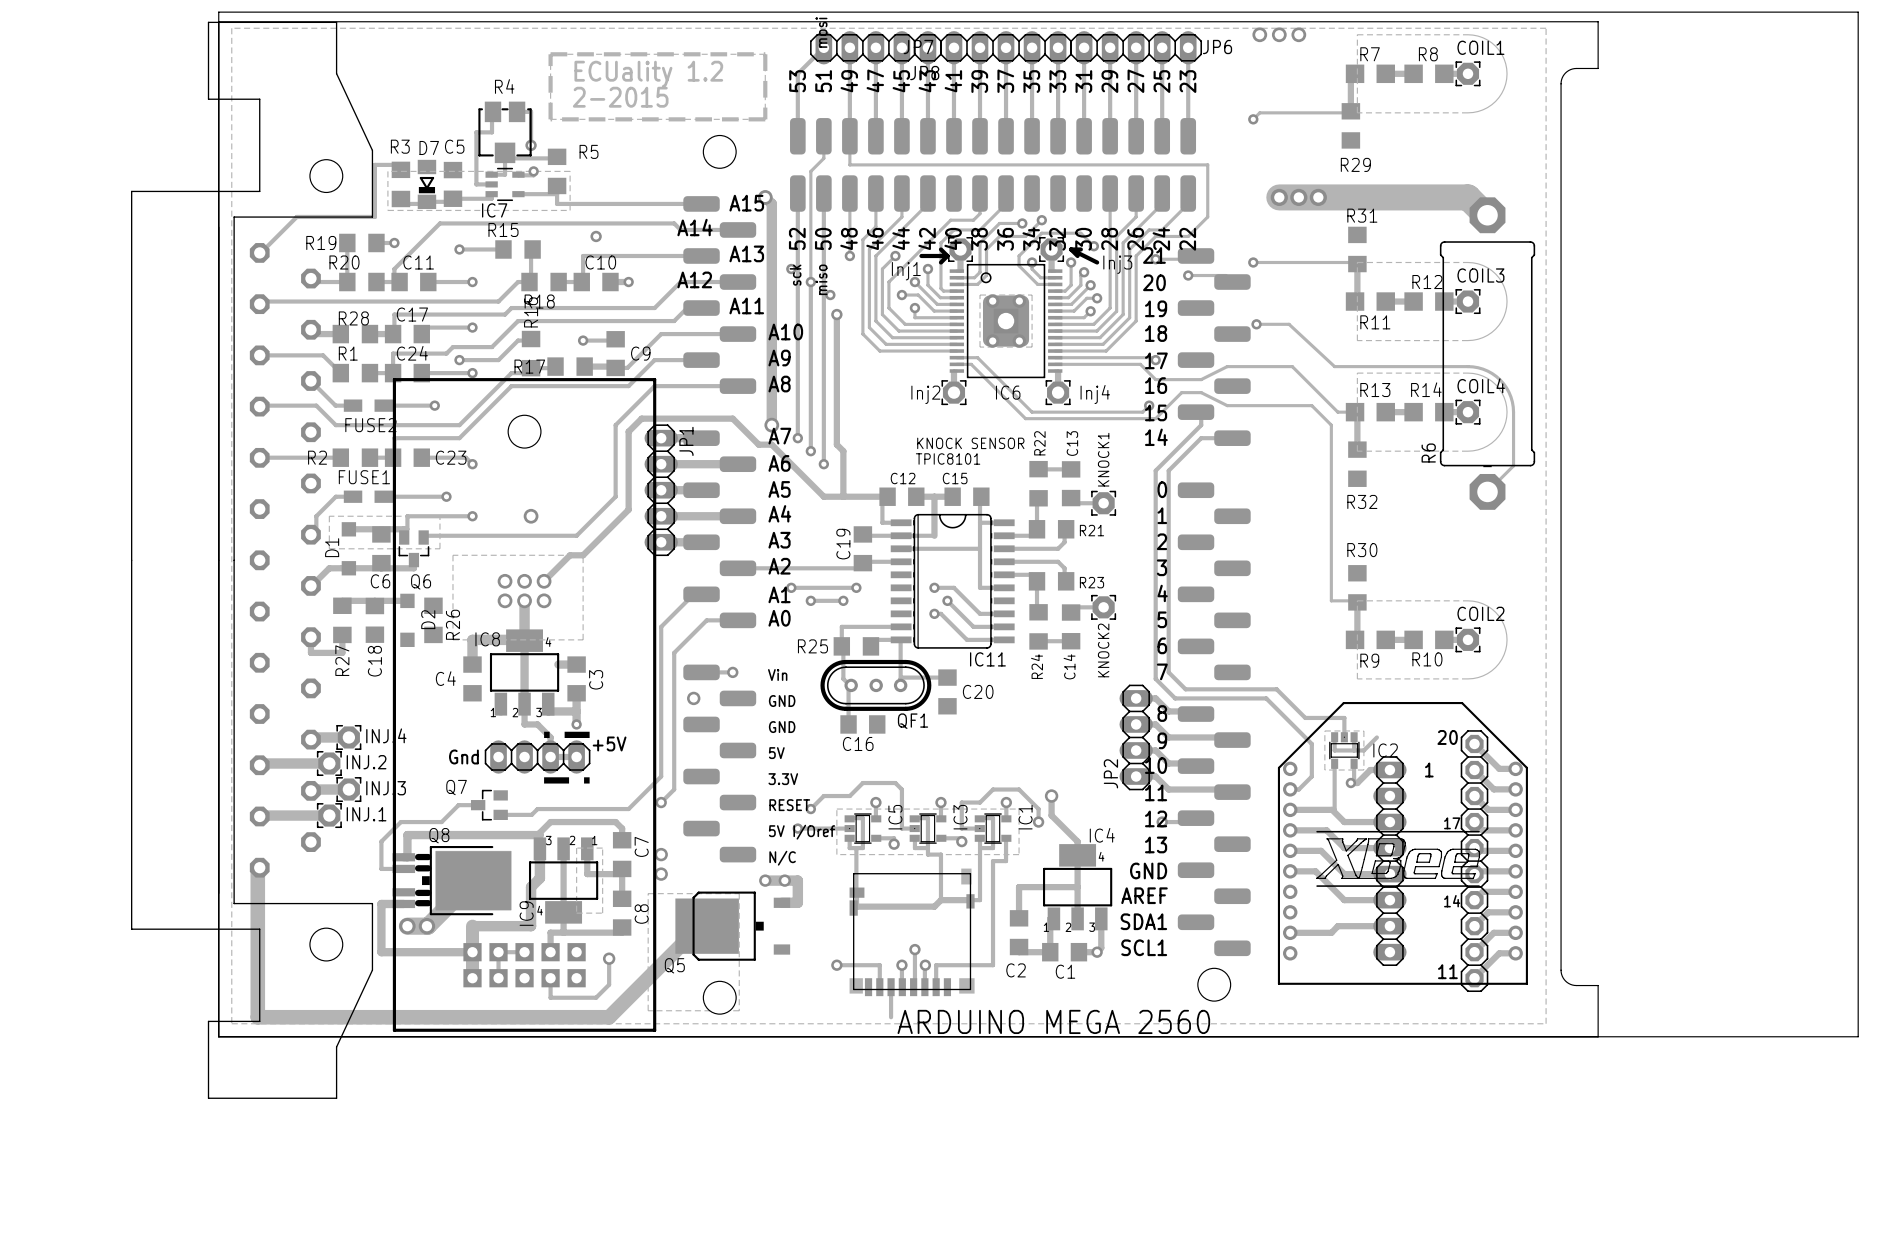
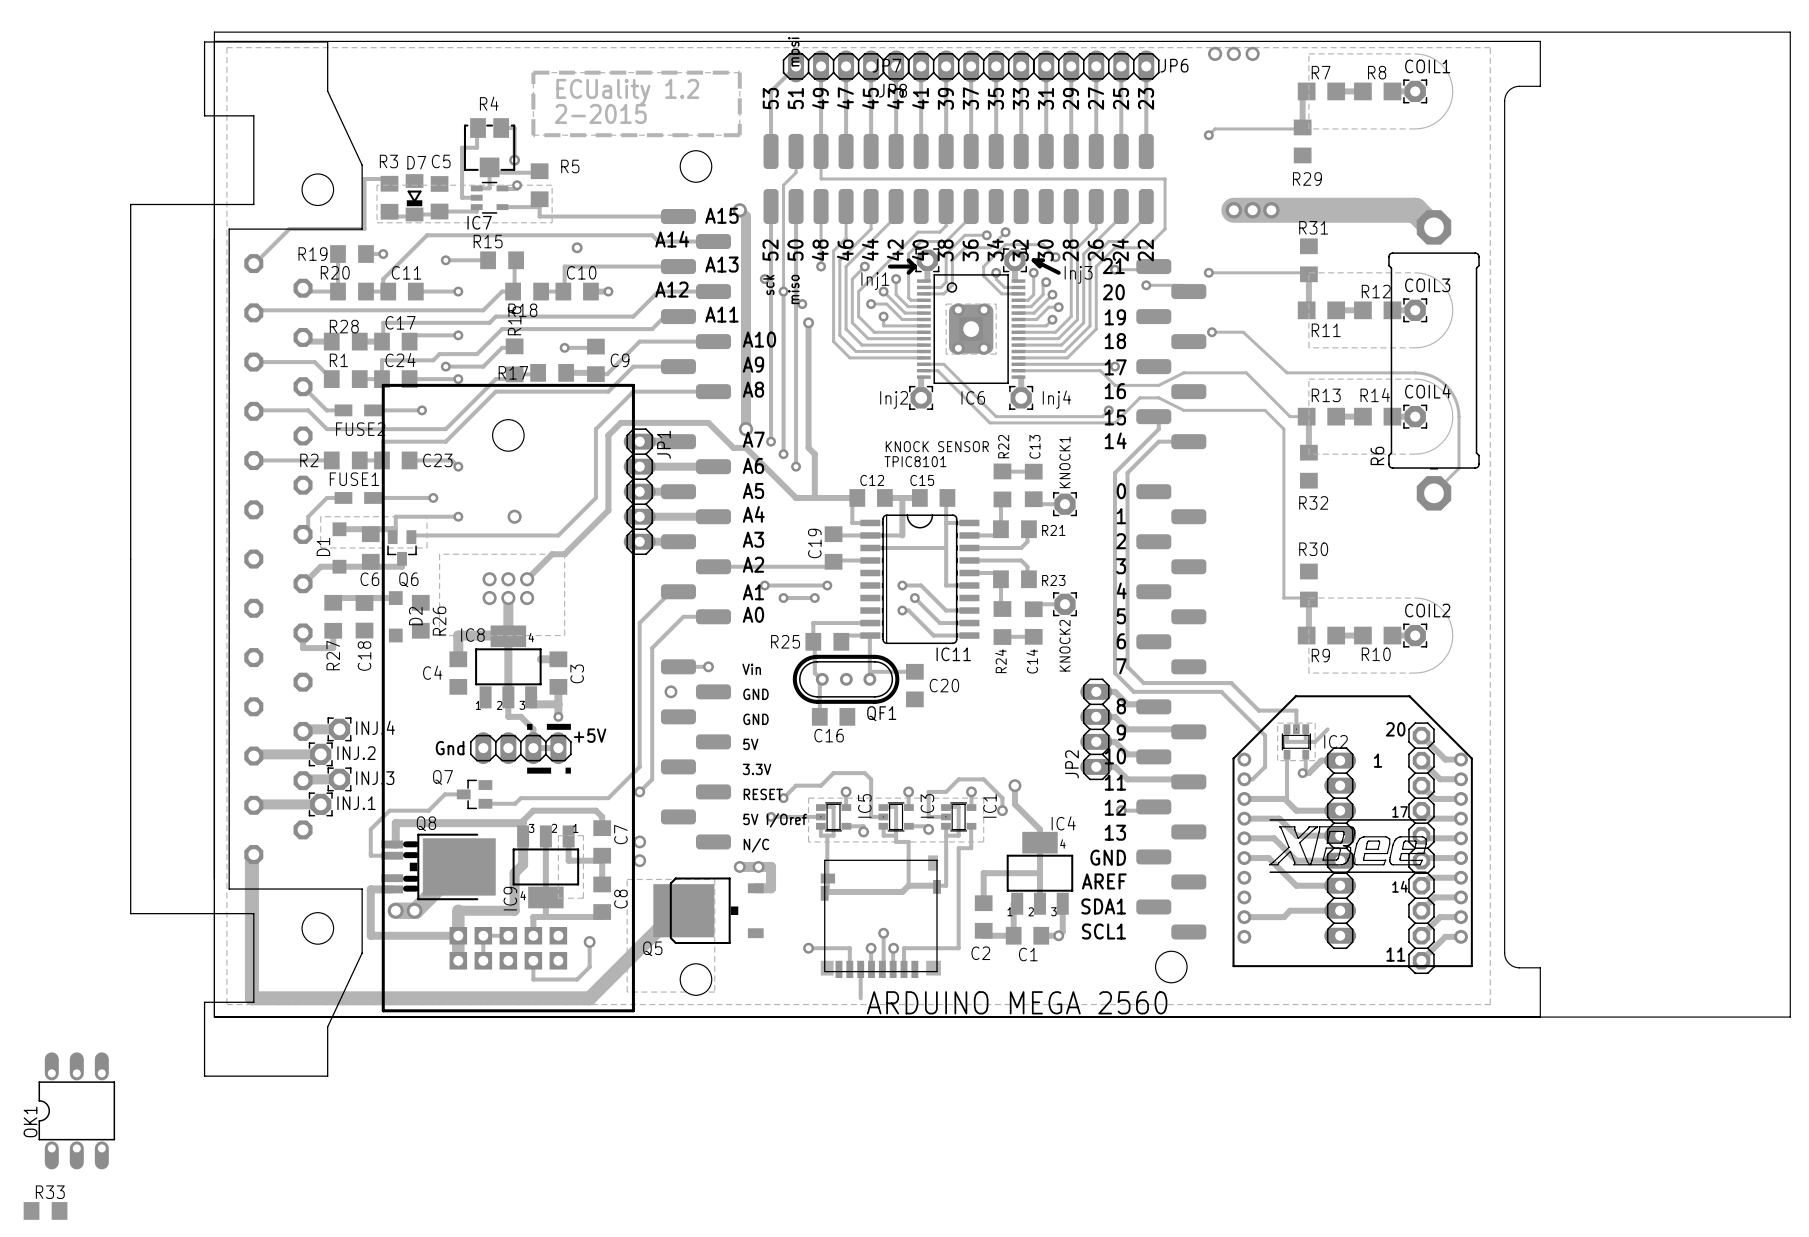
OK1: none -> (76, 1110)
R33: none -> (45, 1210)

